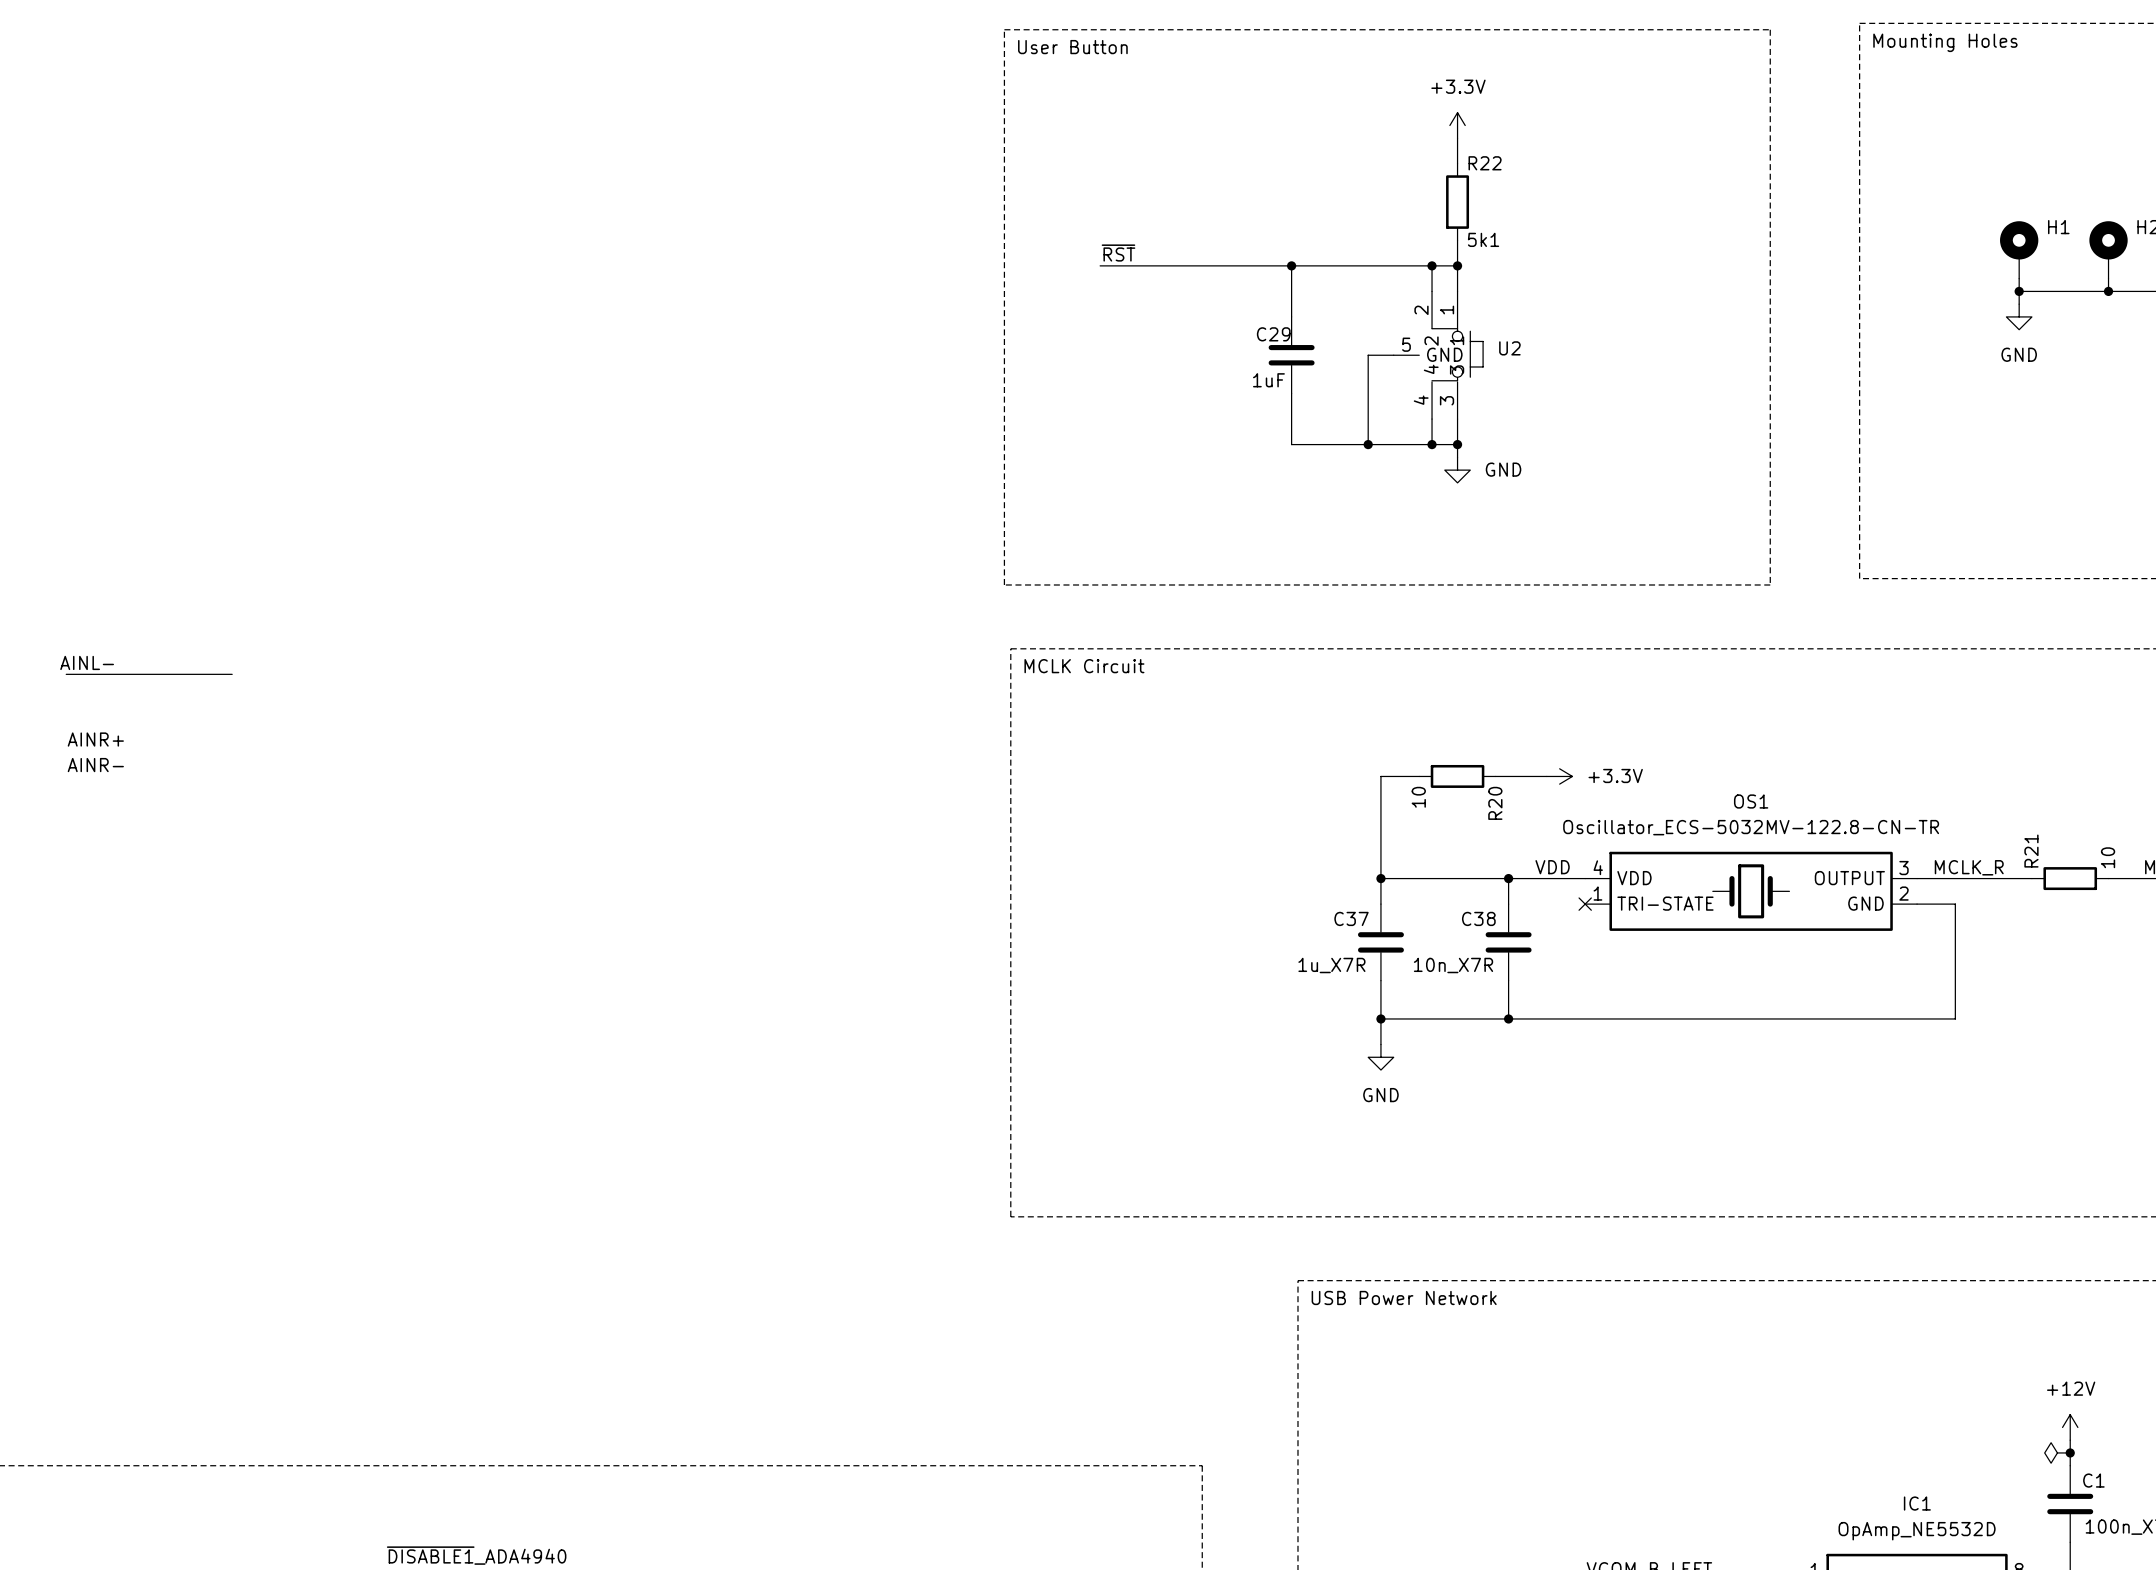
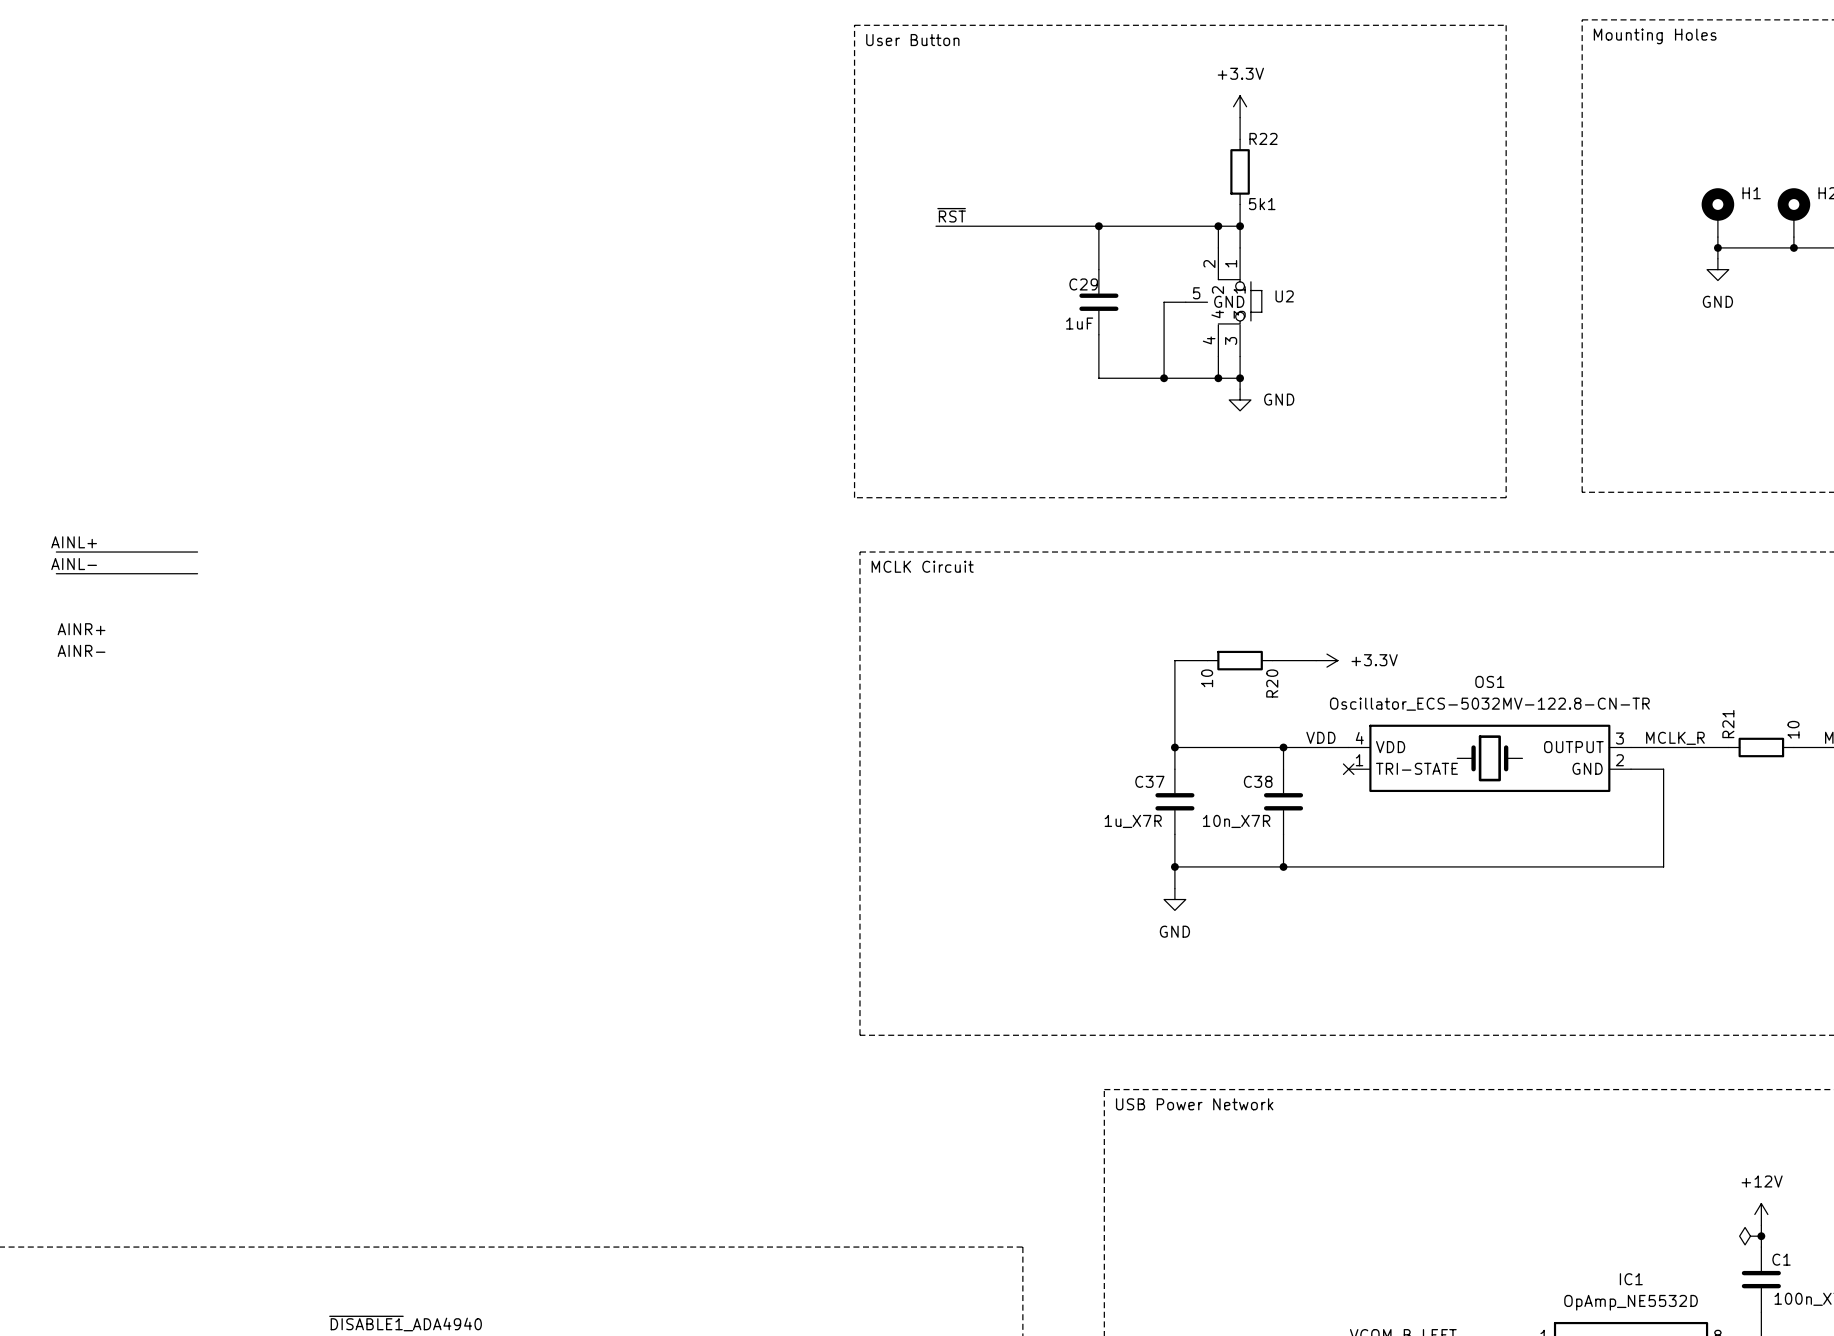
label: none -> AINL+ (74, 542)
wire: none -> (56, 552) (197, 552)

